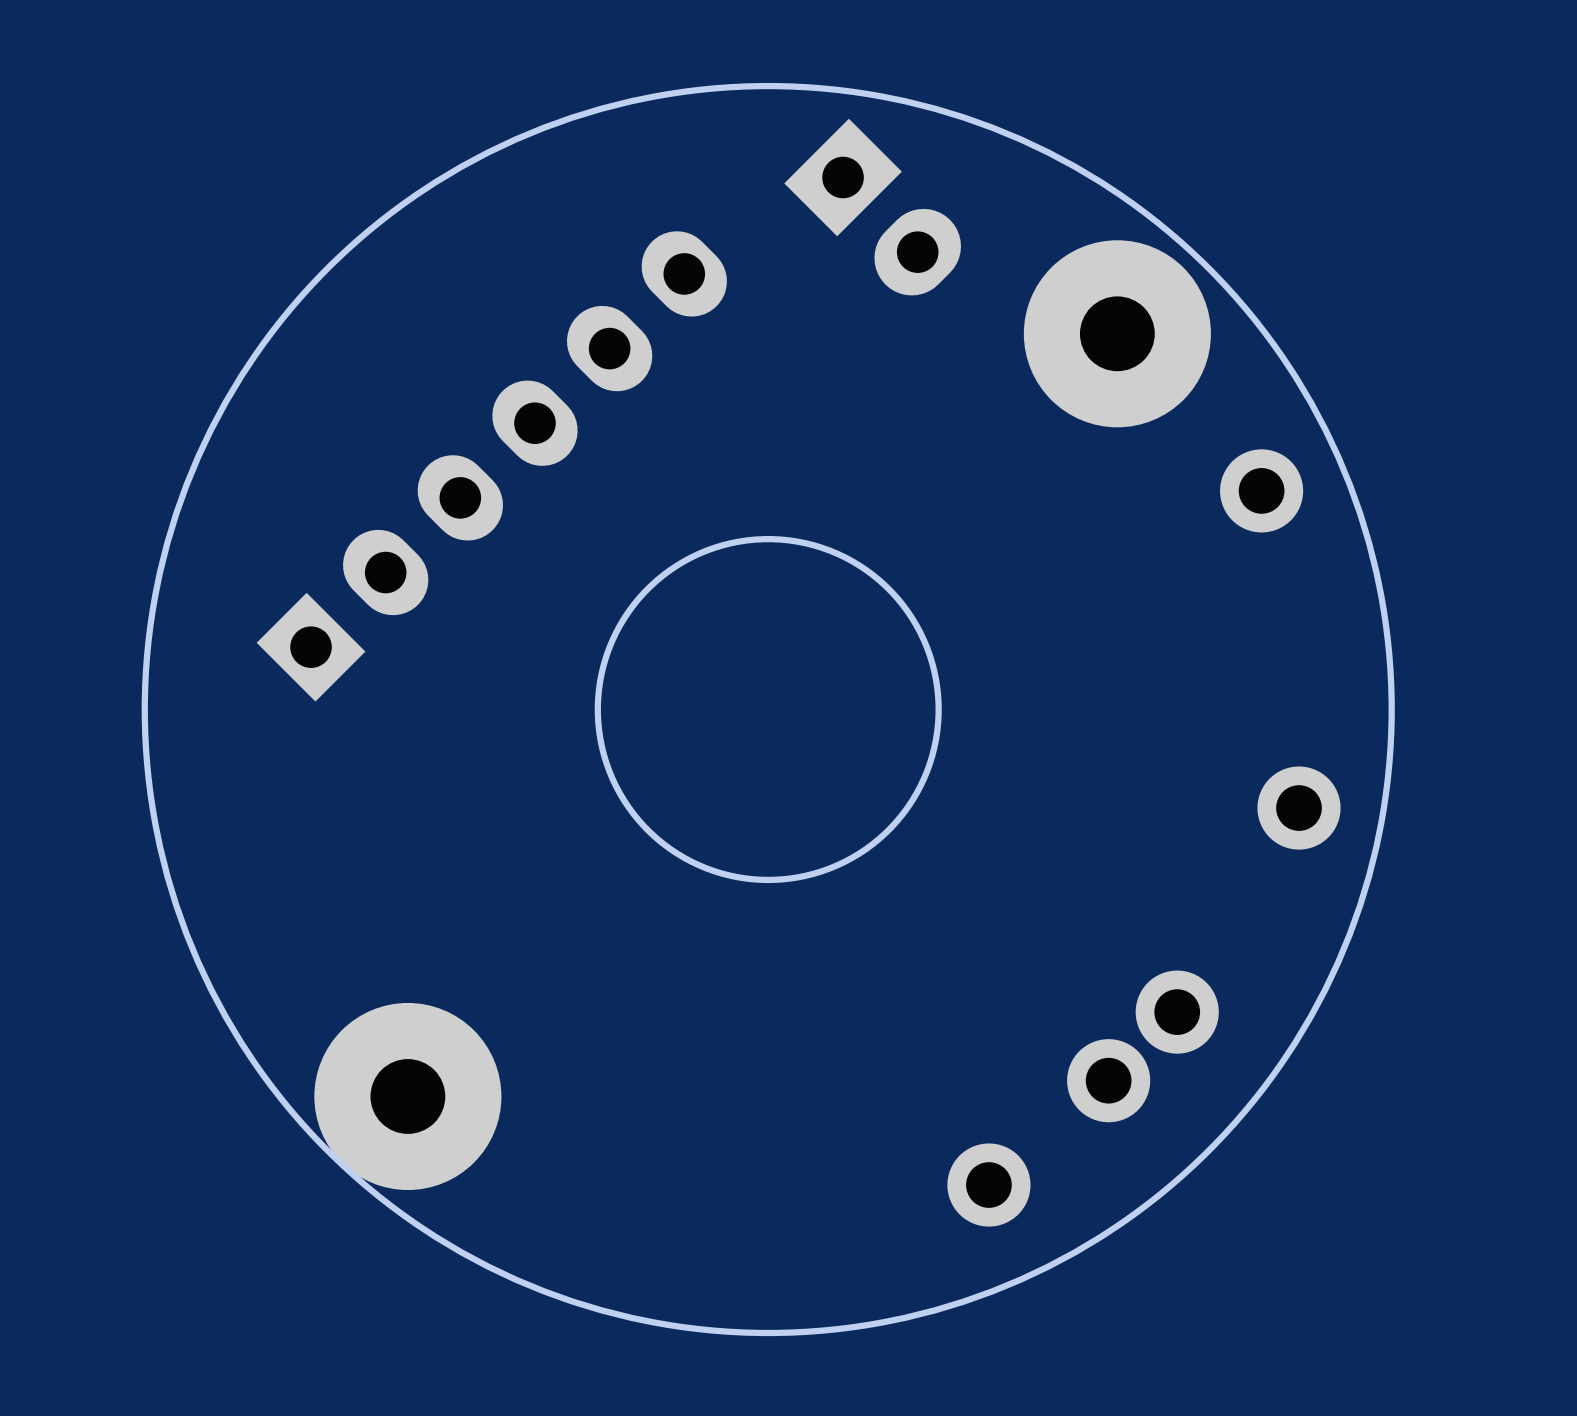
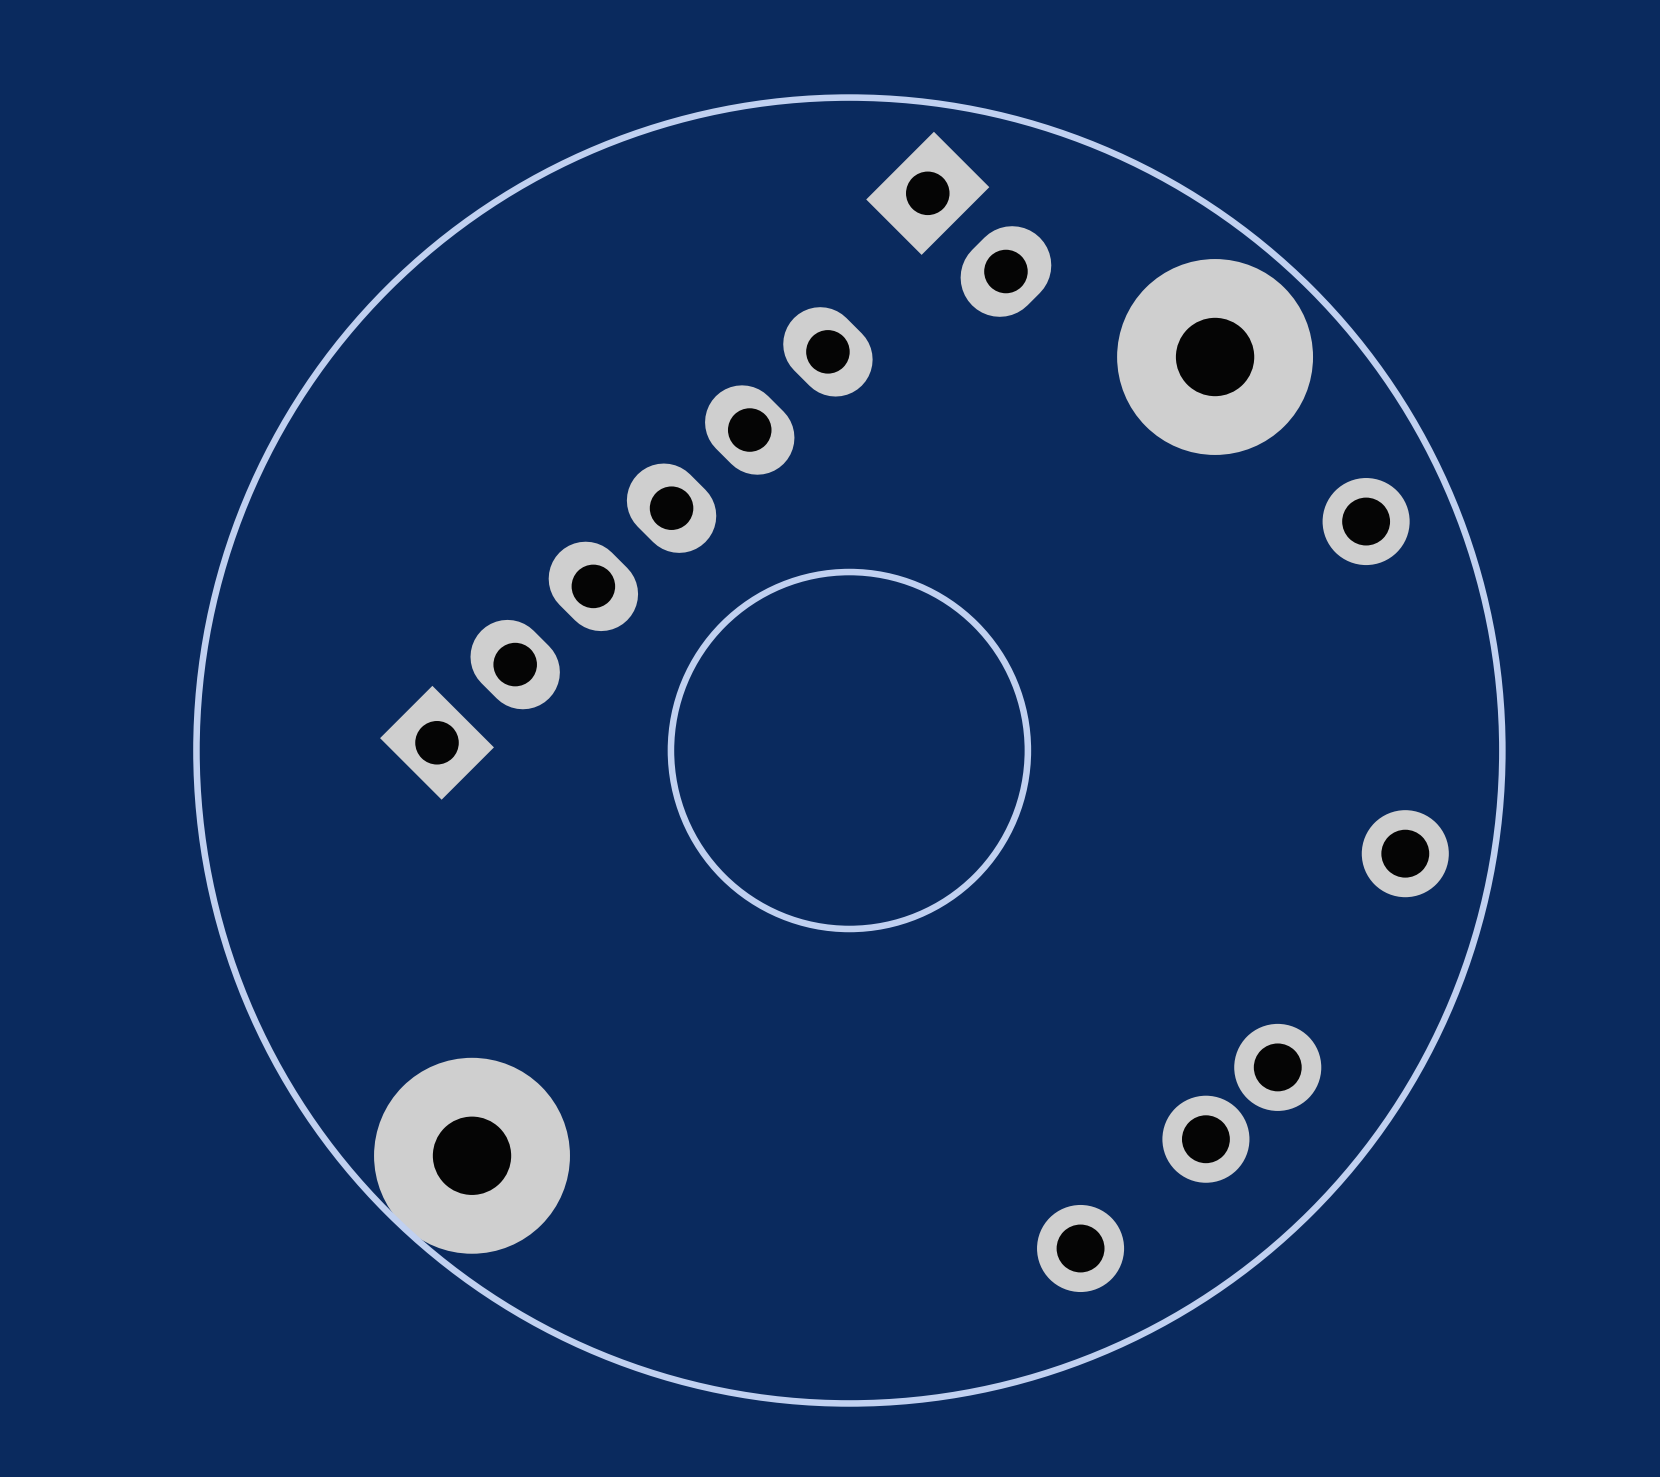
part position: (491, 466) -> (626, 553)

